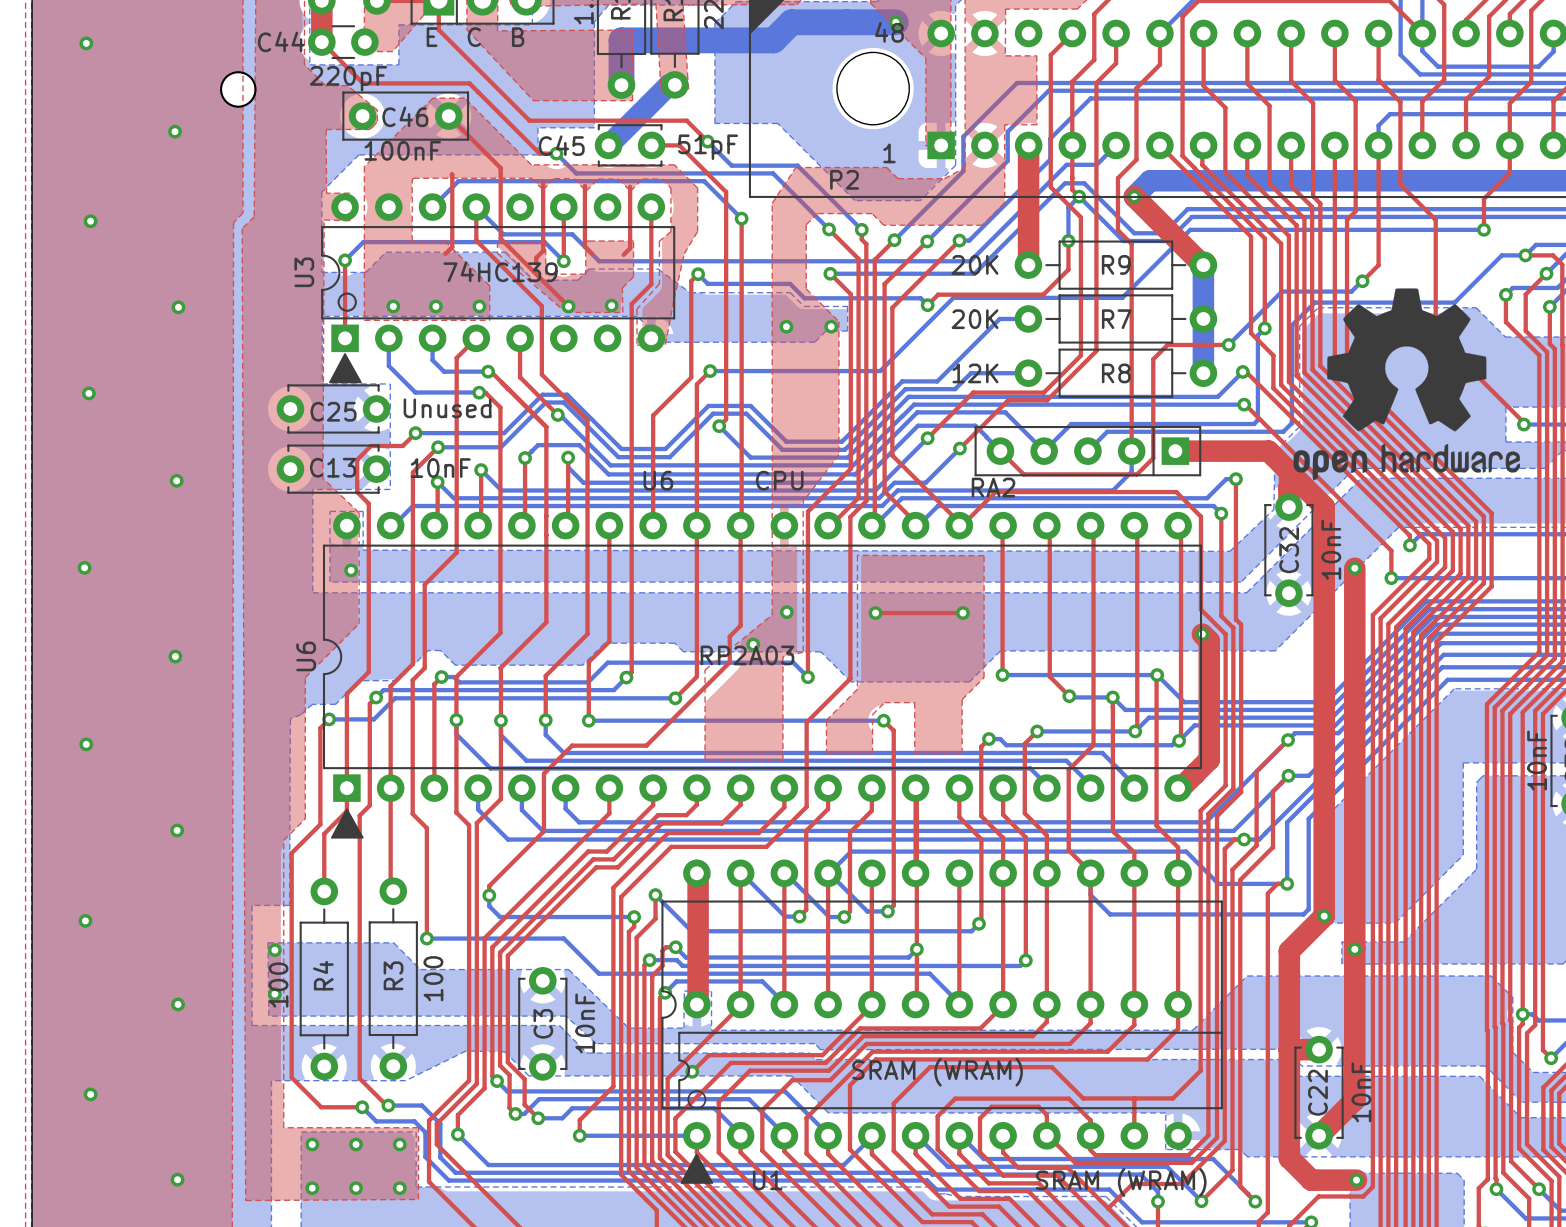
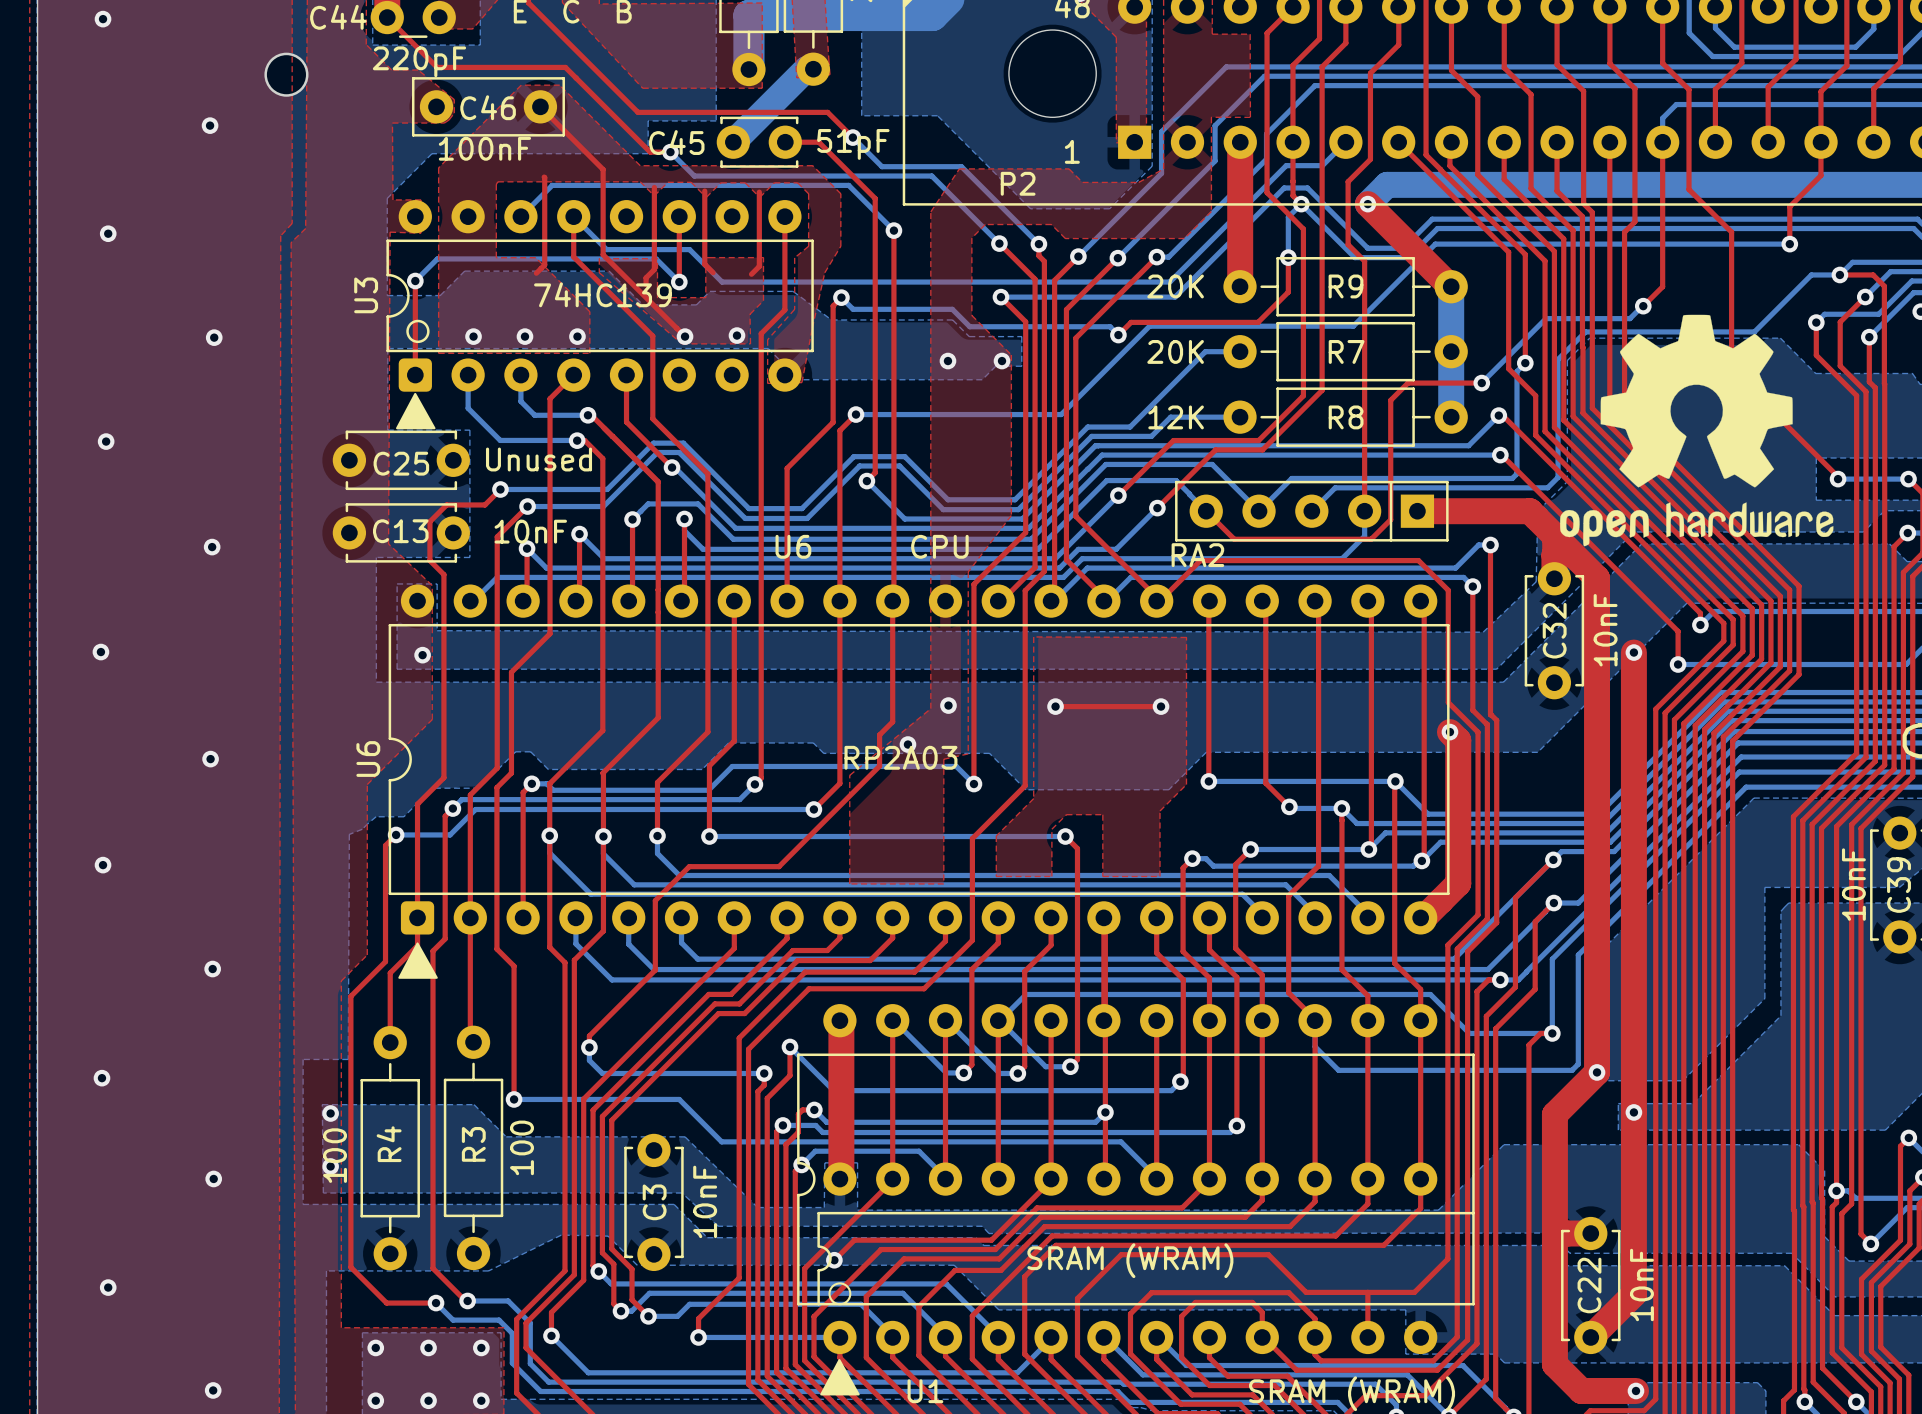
U3 footprint: [321, 193, 676, 353] -> [386, 200, 814, 392]
U6 footprint: [322, 511, 1203, 802] -> [388, 584, 1450, 935]

